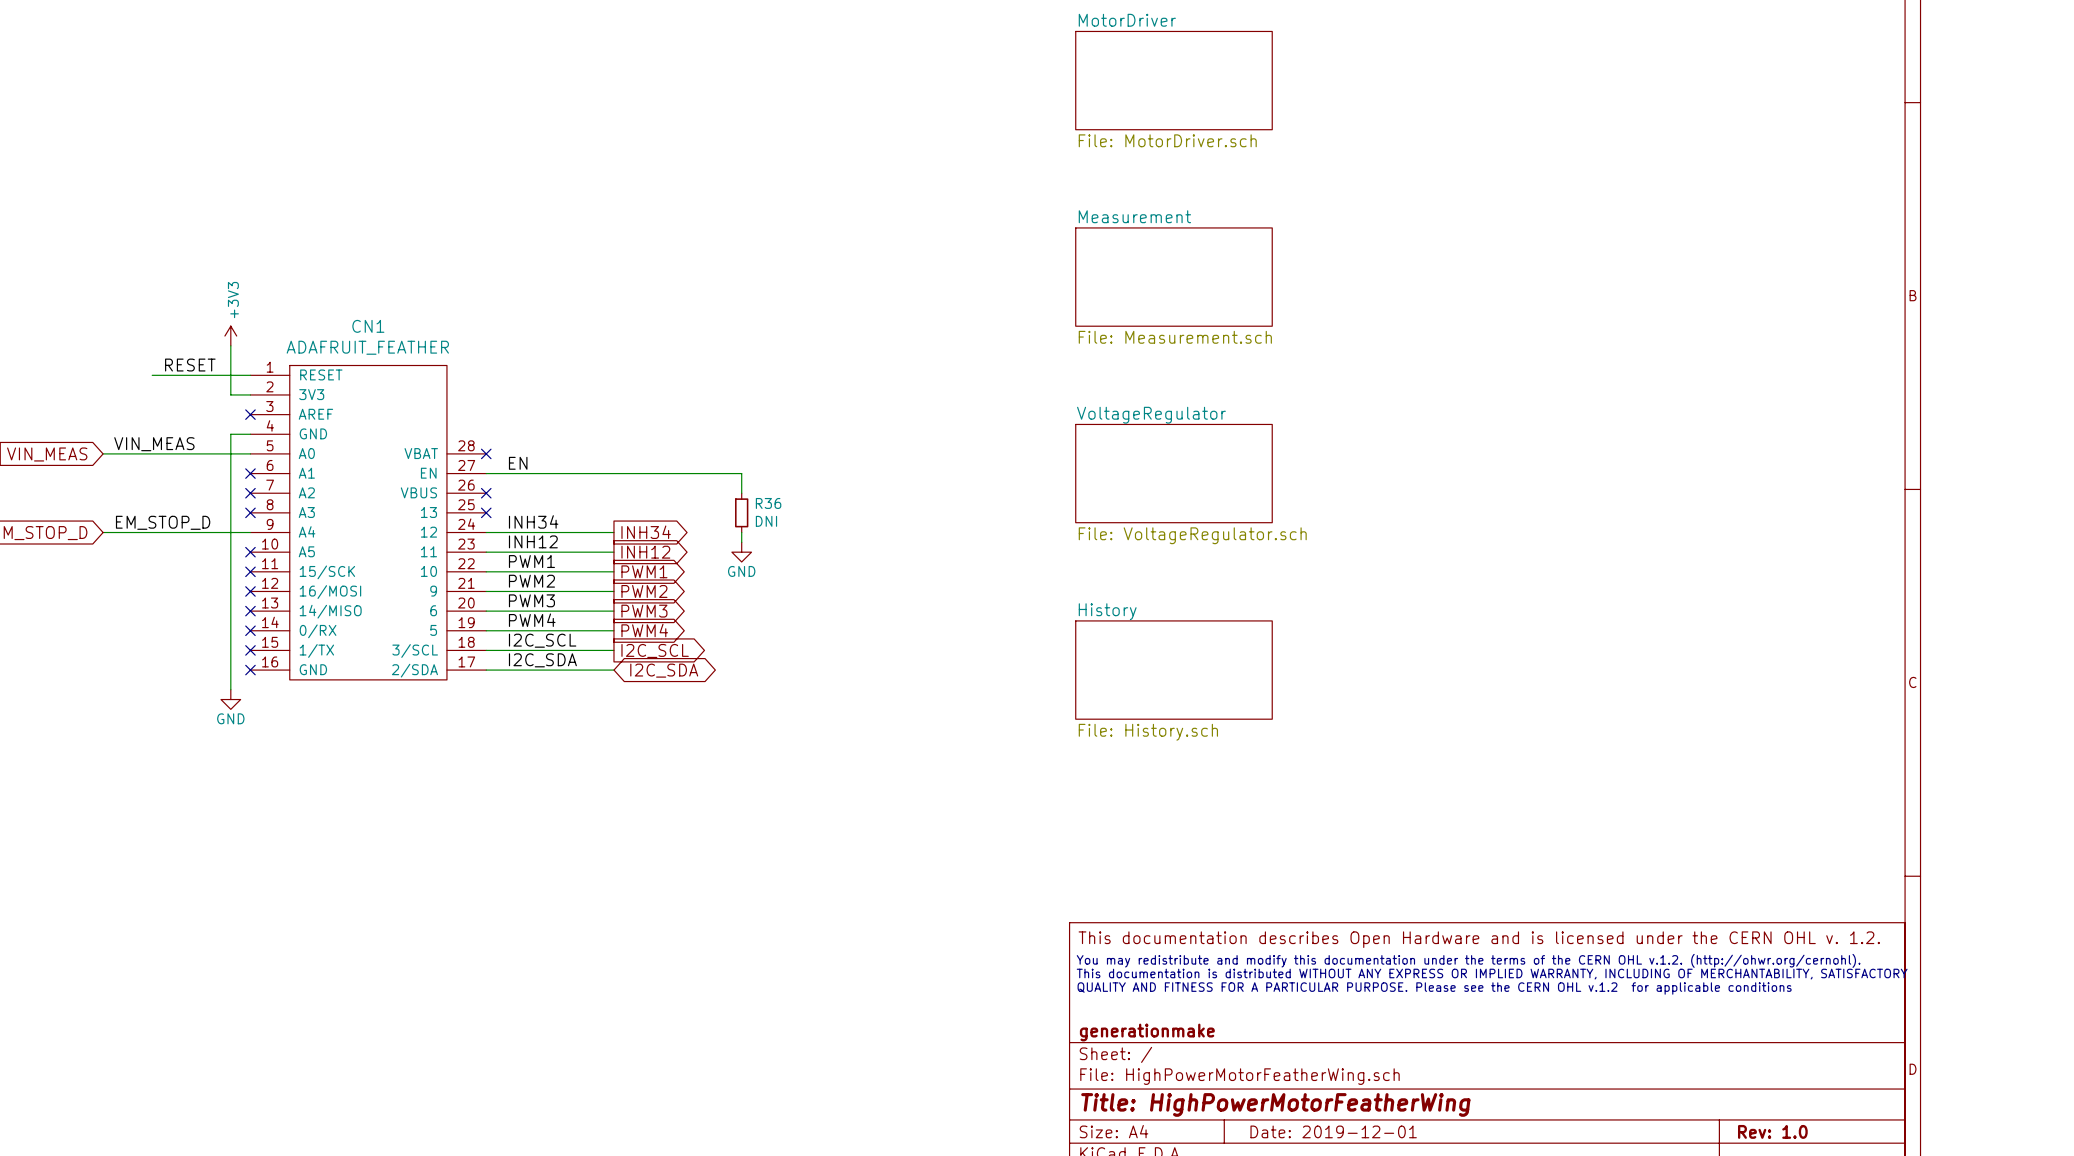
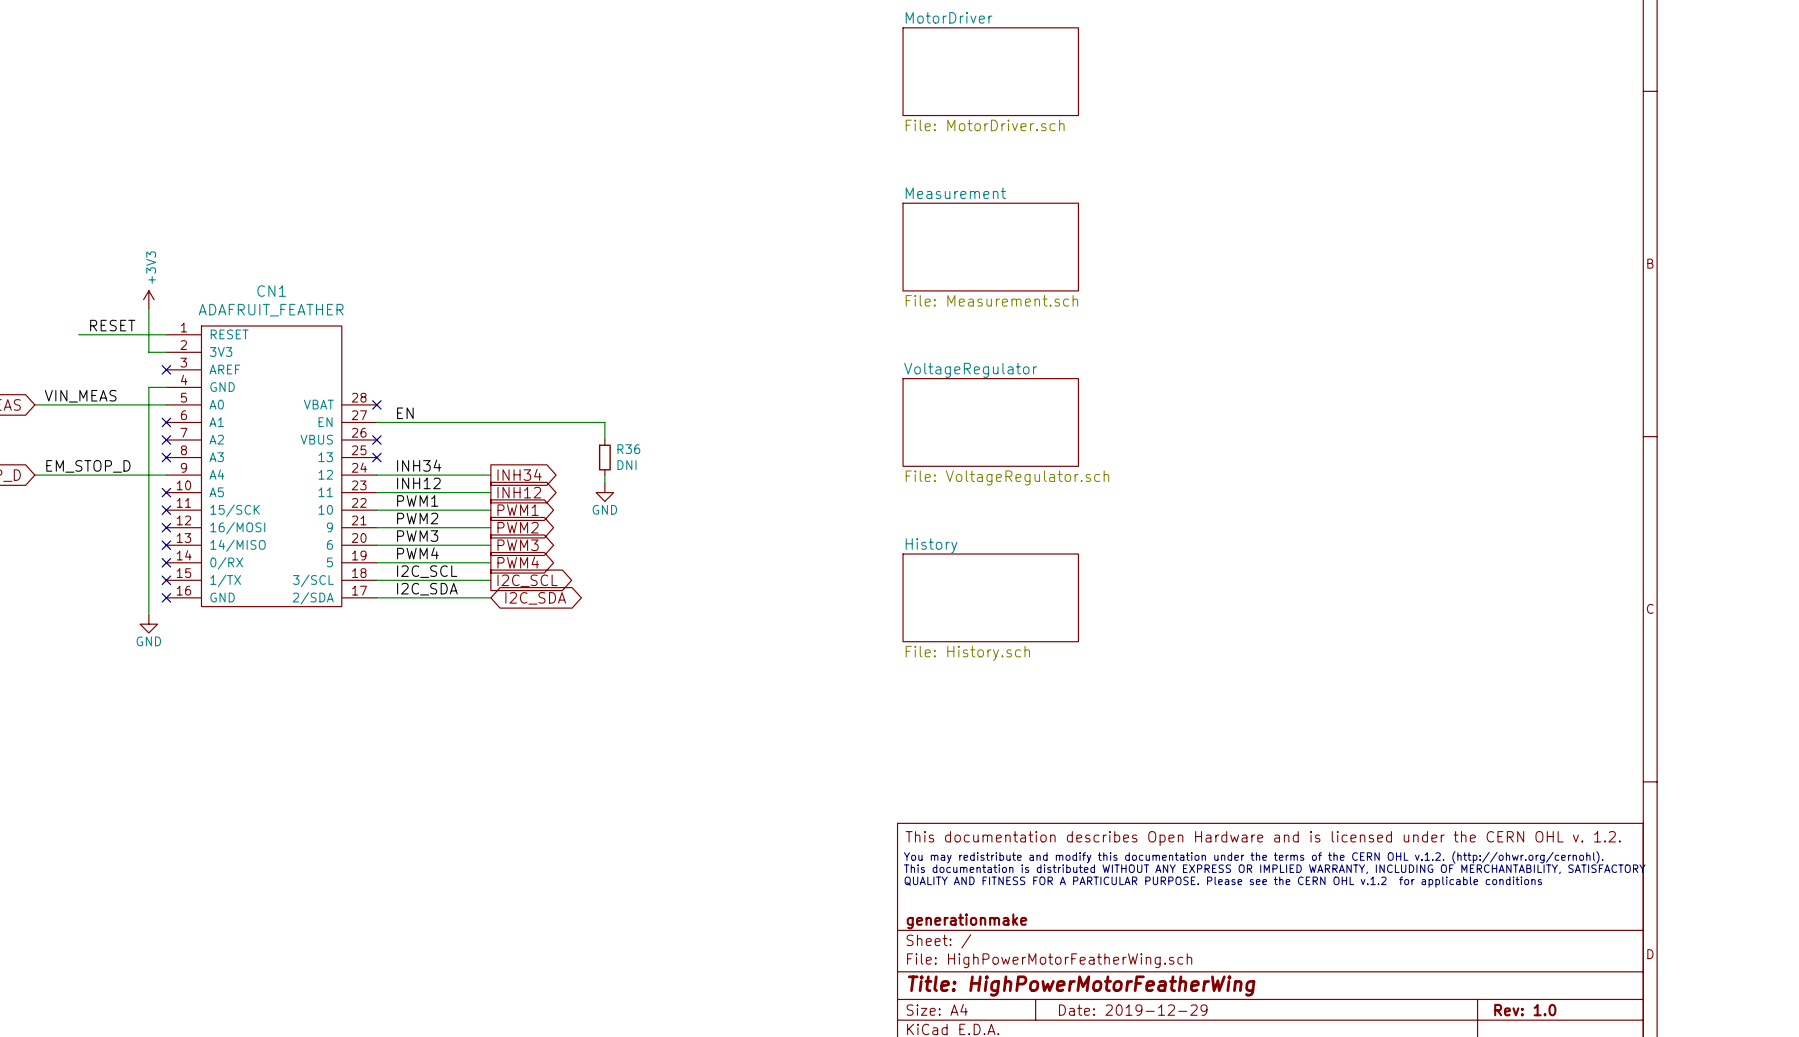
title block: Date: 2019-12-01 (1333, 1131) -> Date: 2019-12-29 (1133, 1010)

